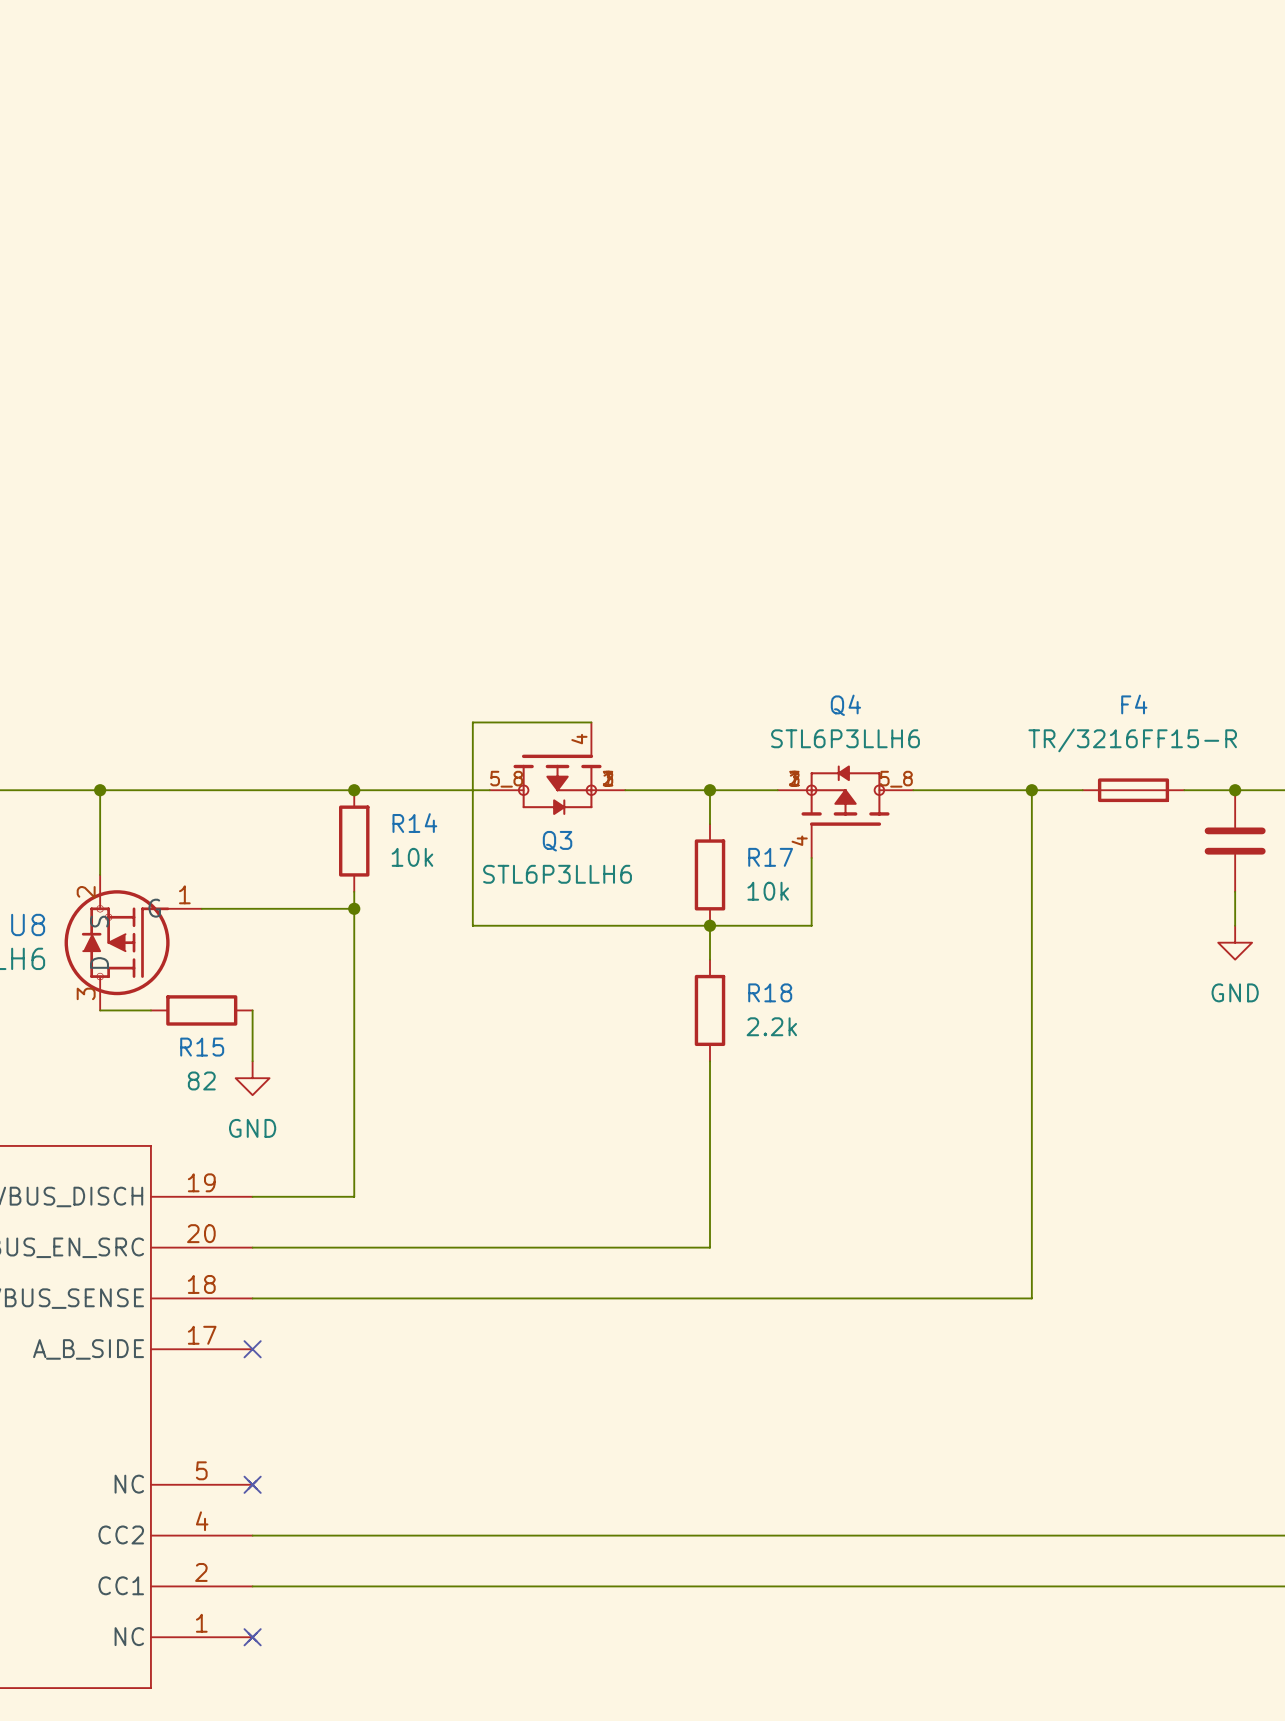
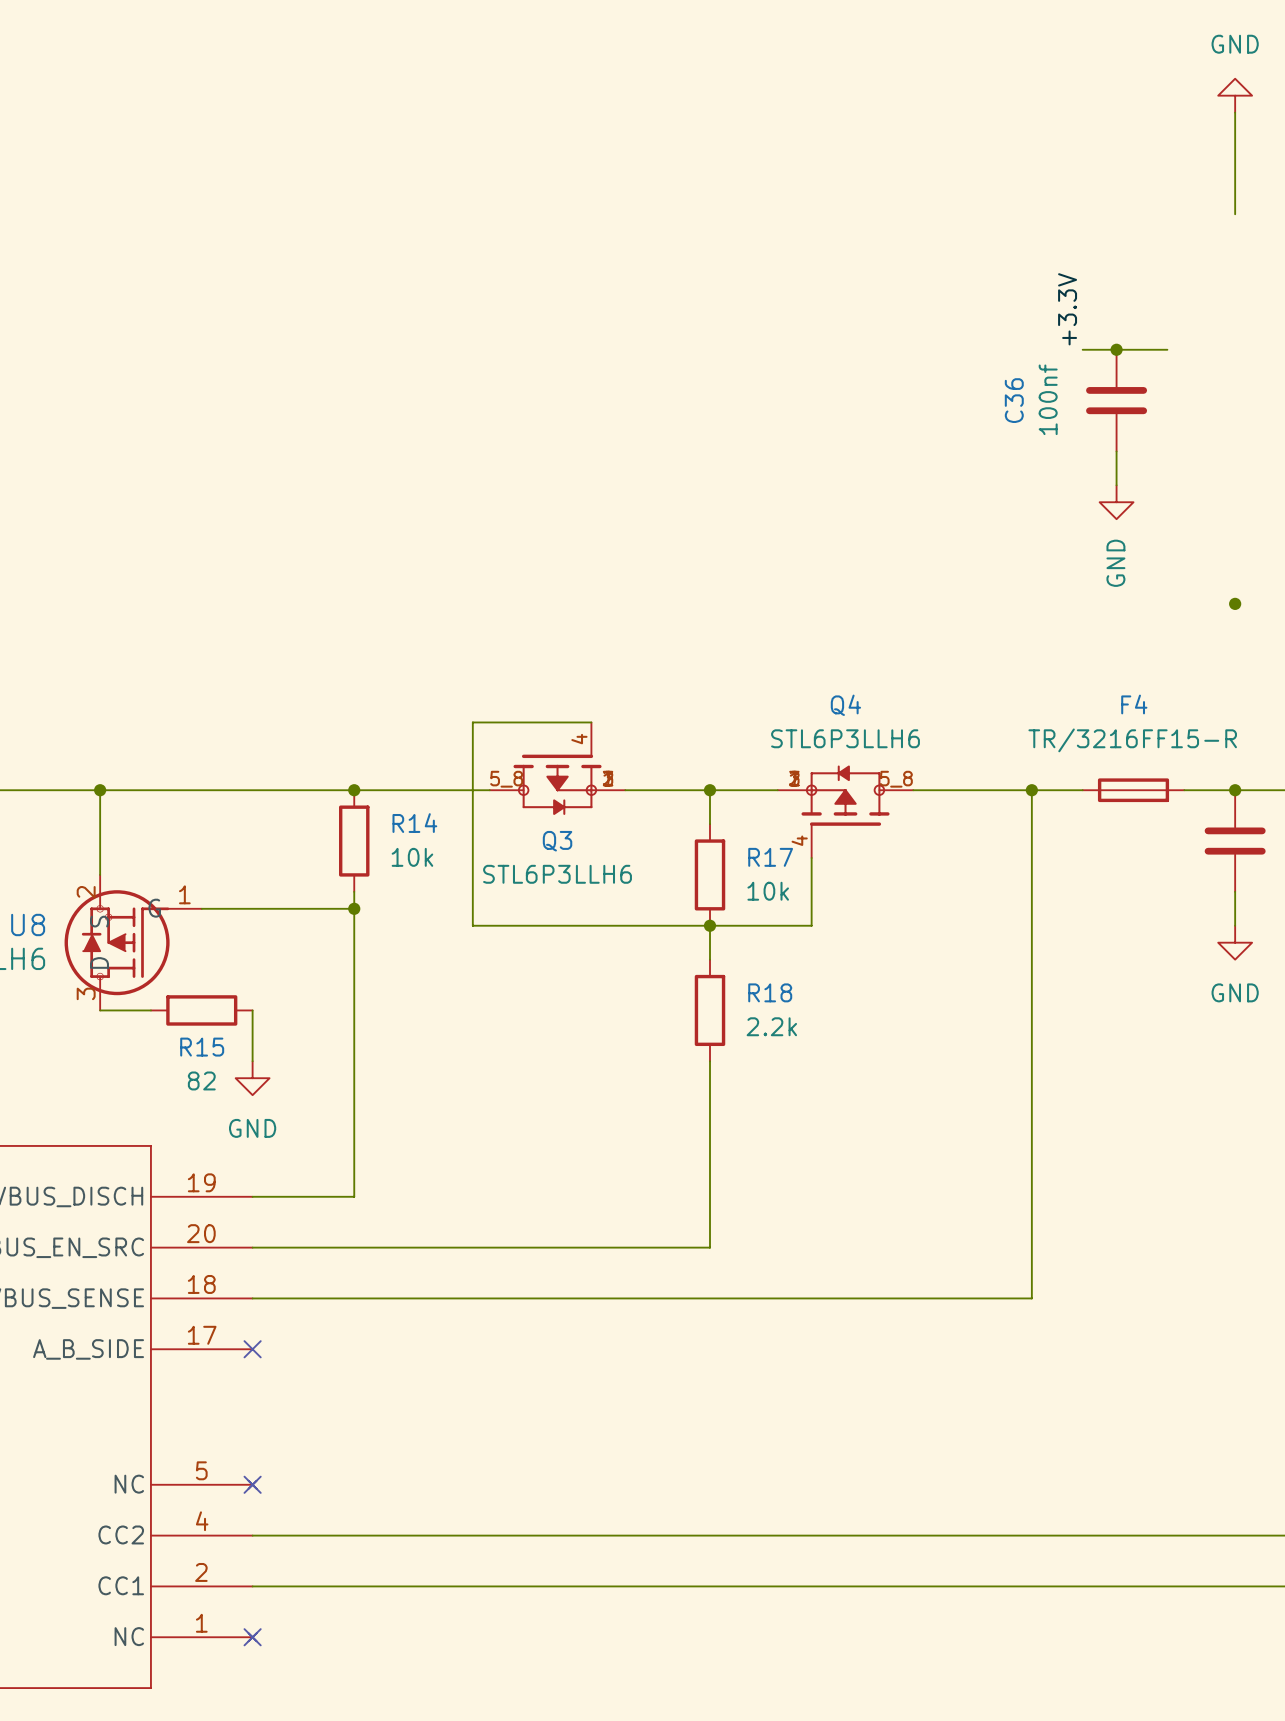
power symbol: none -> GND (1235, 95)
wire: none -> (1235, 112) (1235, 214)
label: none -> +3.3V (1067, 309)
wire: none -> (1082, 349) (1167, 349)
junction: none -> (1116, 349)
C36: none -> 100nf (1116, 400)
wire: none -> (1116, 451) (1116, 485)
power symbol: none -> GND (1116, 502)
junction: none -> (1235, 603)

